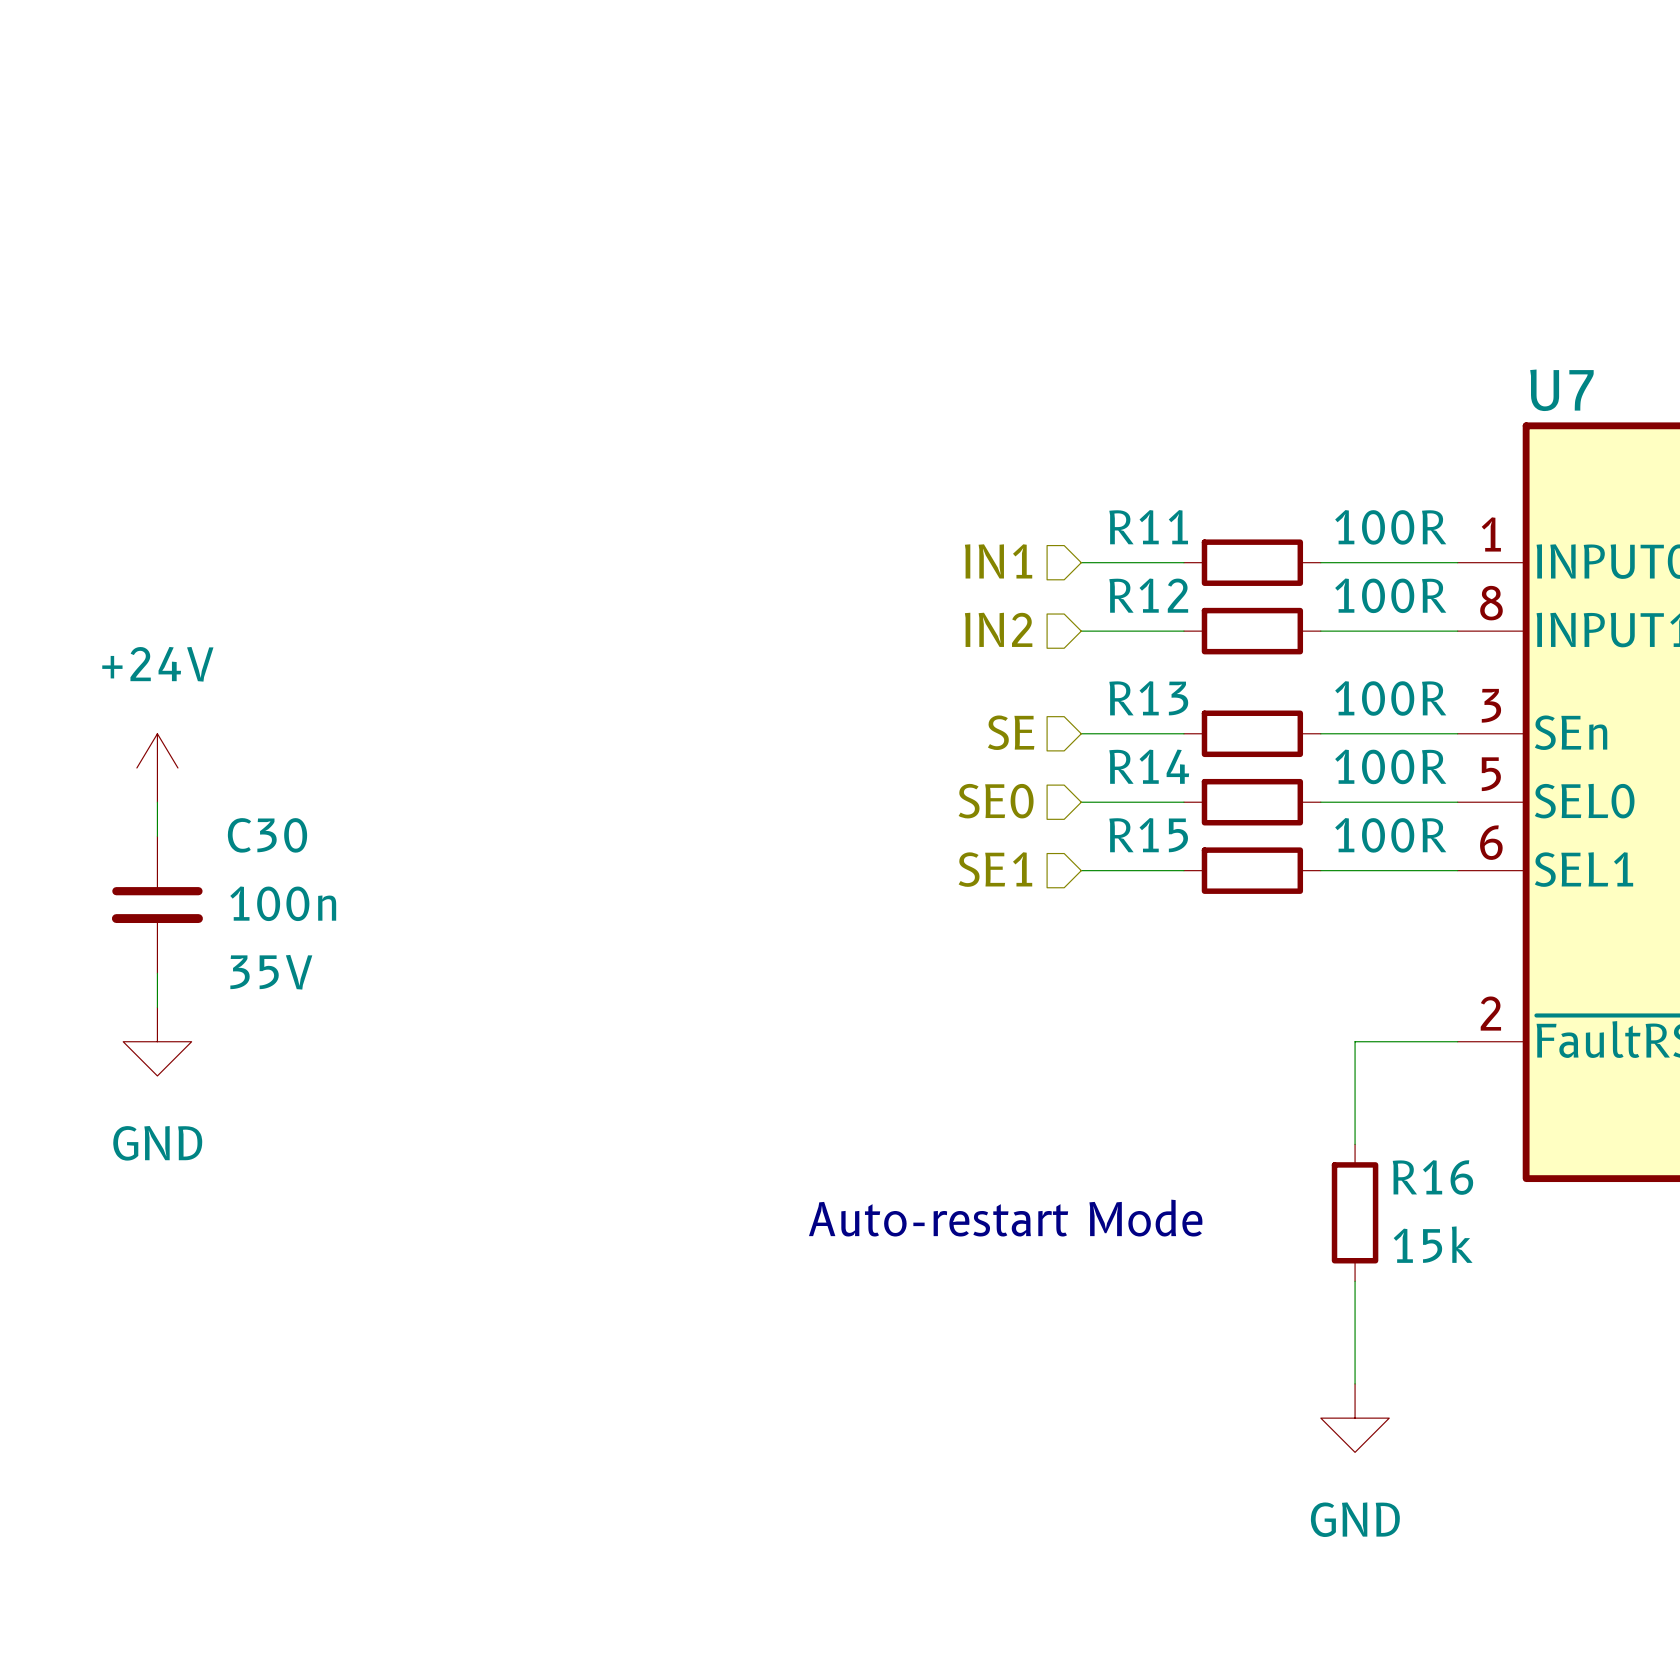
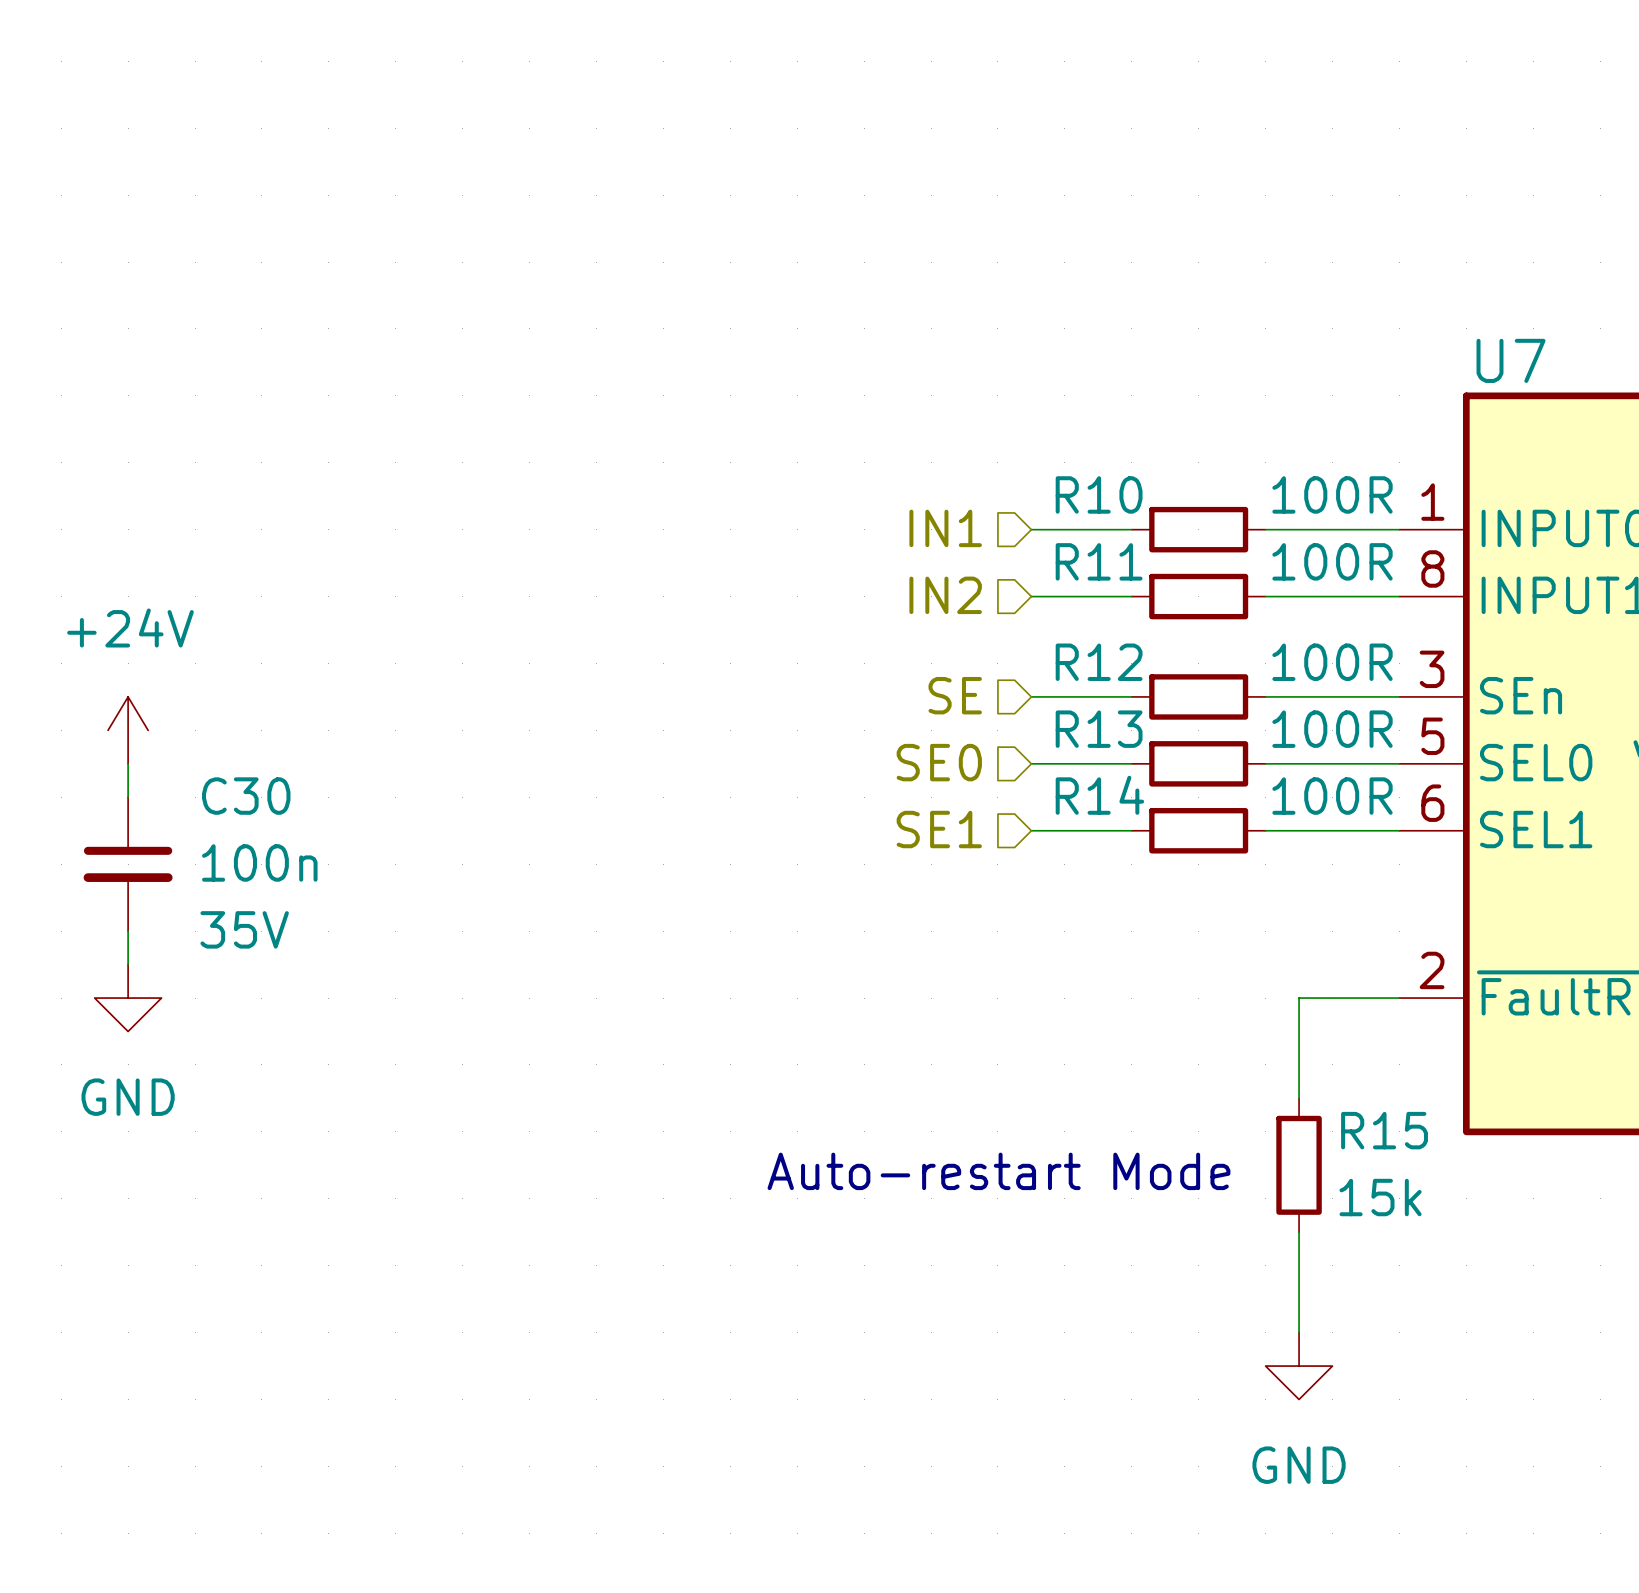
R11 name: R11 (1148, 527) -> R10 (1099, 494)
R12 name: R12 (1148, 595) -> R11 (1099, 561)
R13 name: R13 (1148, 698) -> R12 (1099, 662)
R14 name: R14 (1149, 766) -> R13 (1099, 729)
R15 name: R15 (1148, 835) -> R14 (1099, 795)
R16 name: R16 (1432, 1177) -> R15 (1384, 1130)

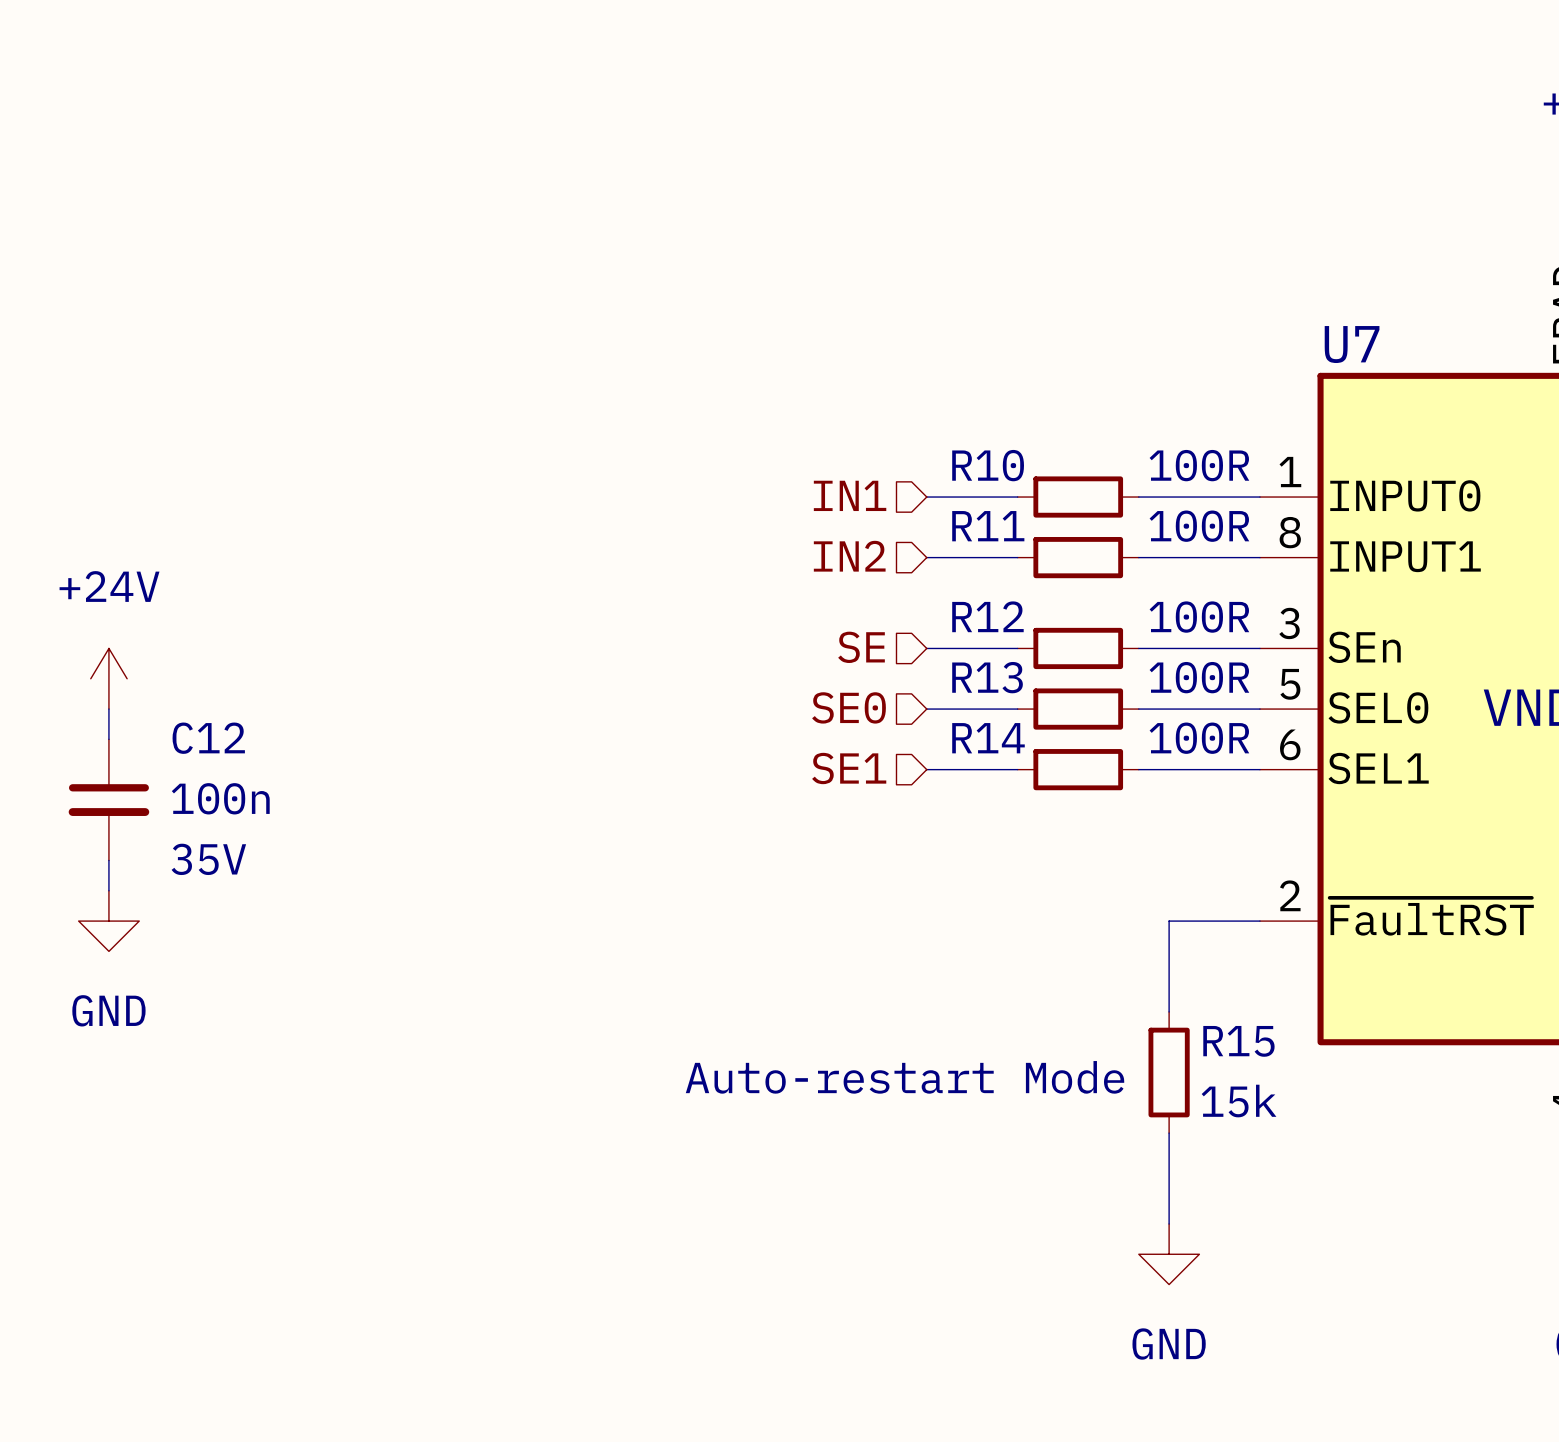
C30 name: C30 (246, 796) -> C12 (208, 738)

